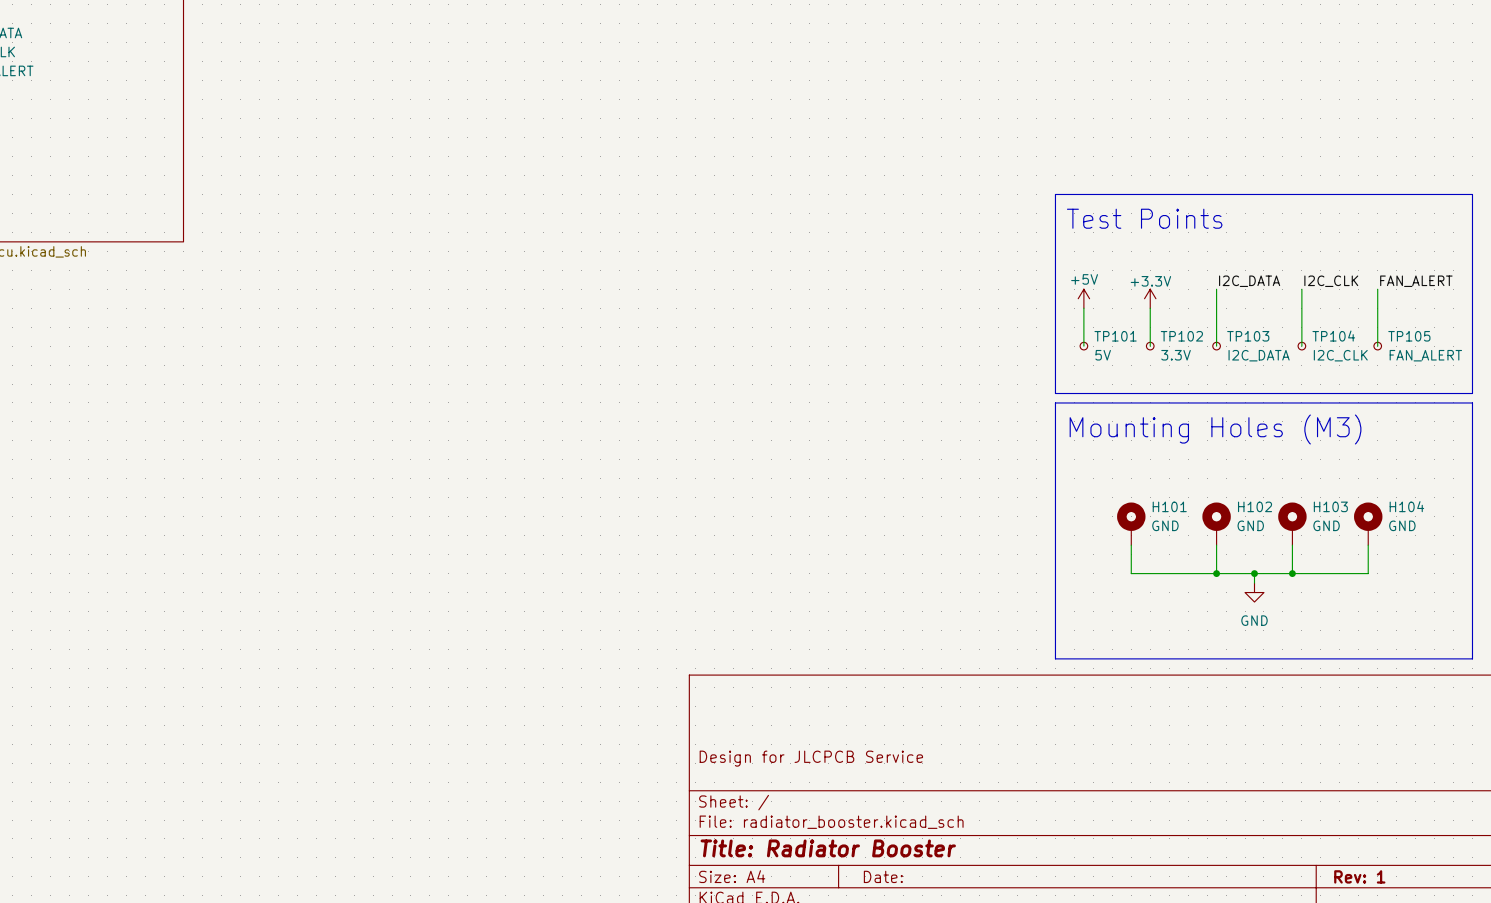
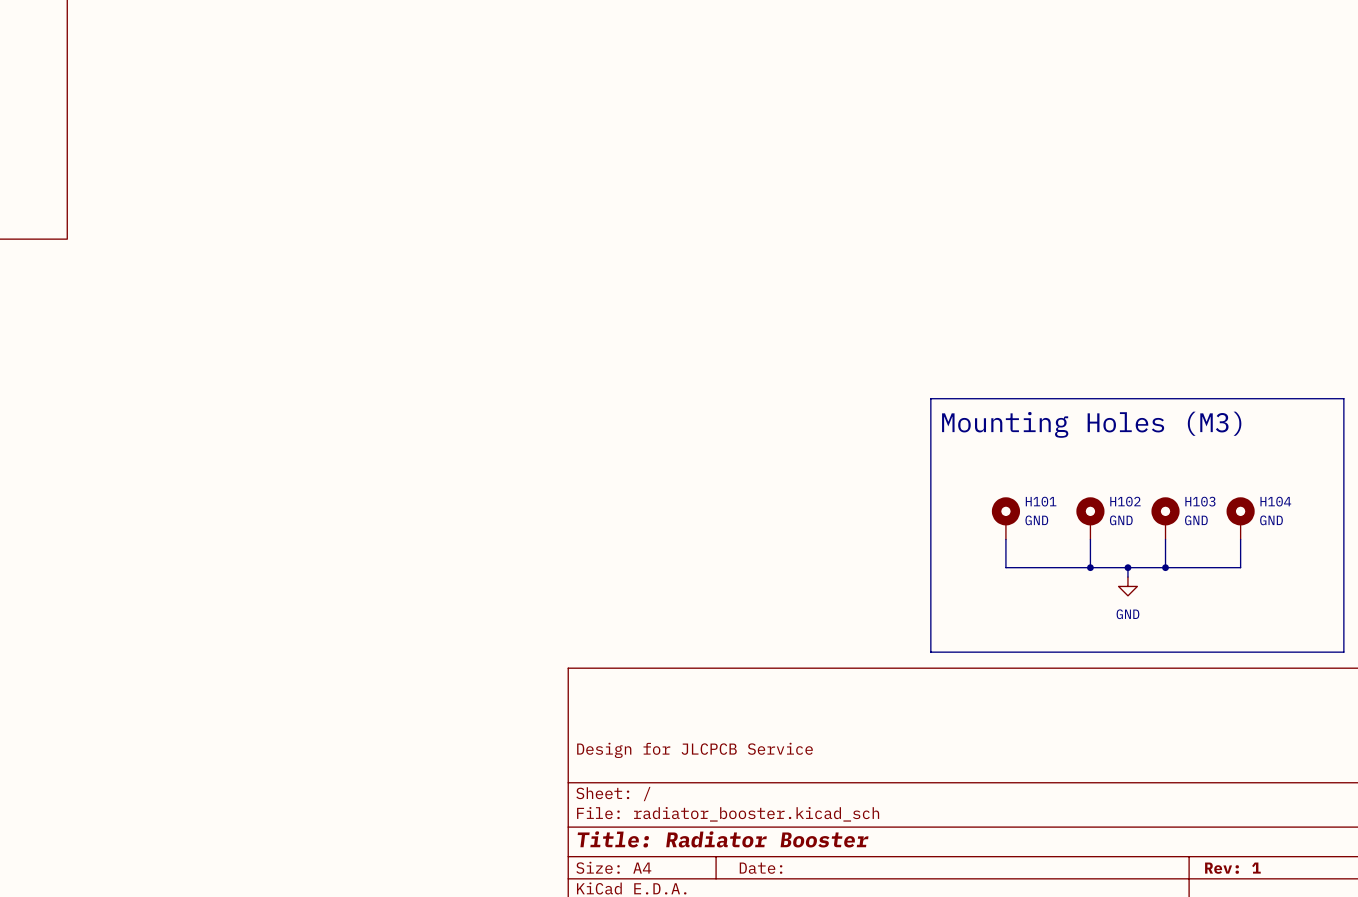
line: (1055, 194) (1472, 194) (1472, 393) (1055, 393) (1055, 194) -> none
text: Test Points (1144, 218) -> none
label: I2C_DATA (1249, 281) -> none
label: I2C_CLK (1331, 281) -> none
label: FAN_ALERT (1416, 281) -> none
wire: (1216, 289) (1216, 346) -> none
wire: (1301, 289) (1301, 346) -> none
wire: (1377, 289) (1377, 346) -> none
power symbol: +5V (1083, 298) -> none
power symbol: +3.3V (1150, 298) -> none
wire: (1083, 308) (1083, 346) -> none
wire: (1150, 308) (1150, 346) -> none
TP101: 5V (1083, 346) -> none
TP102: 3.3V (1150, 346) -> none
TP103: I2C_DATA (1216, 346) -> none
TP104: I2C_CLK (1301, 346) -> none
TP105: FAN_ALERT (1377, 346) -> none

